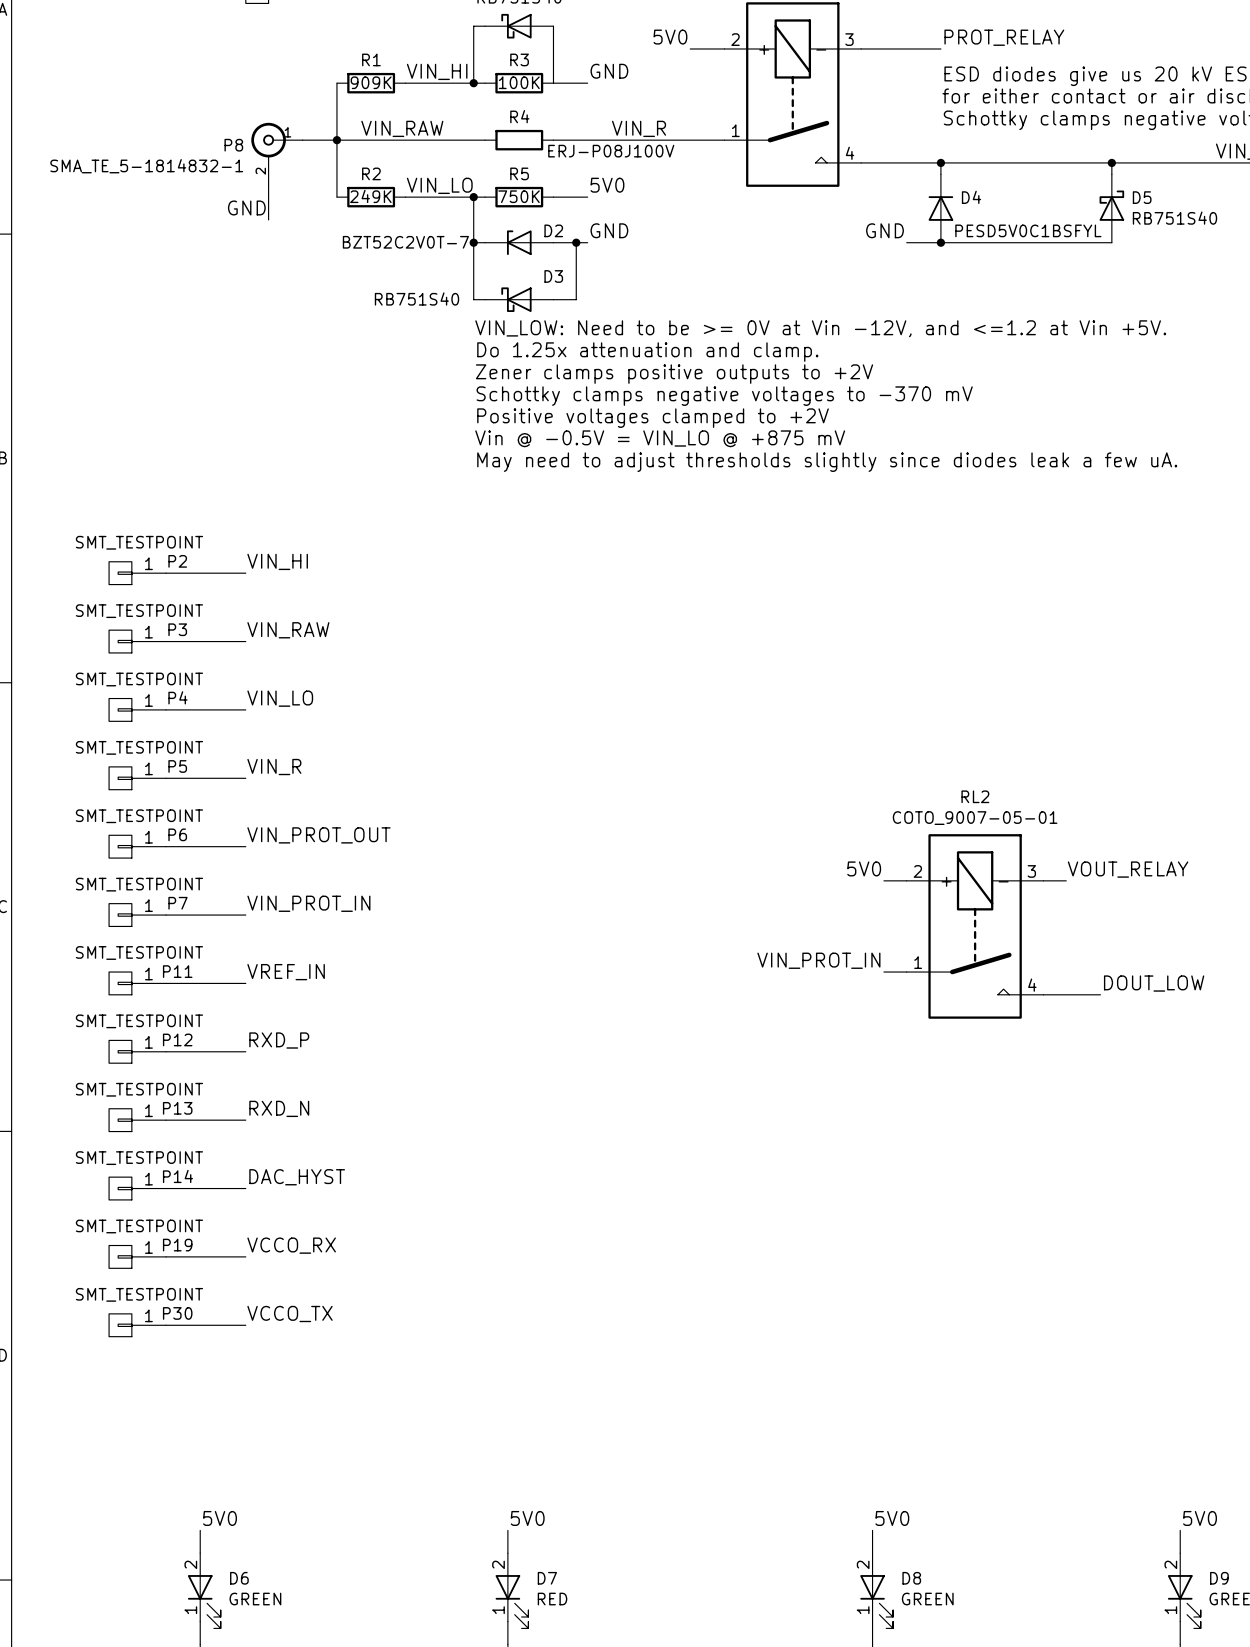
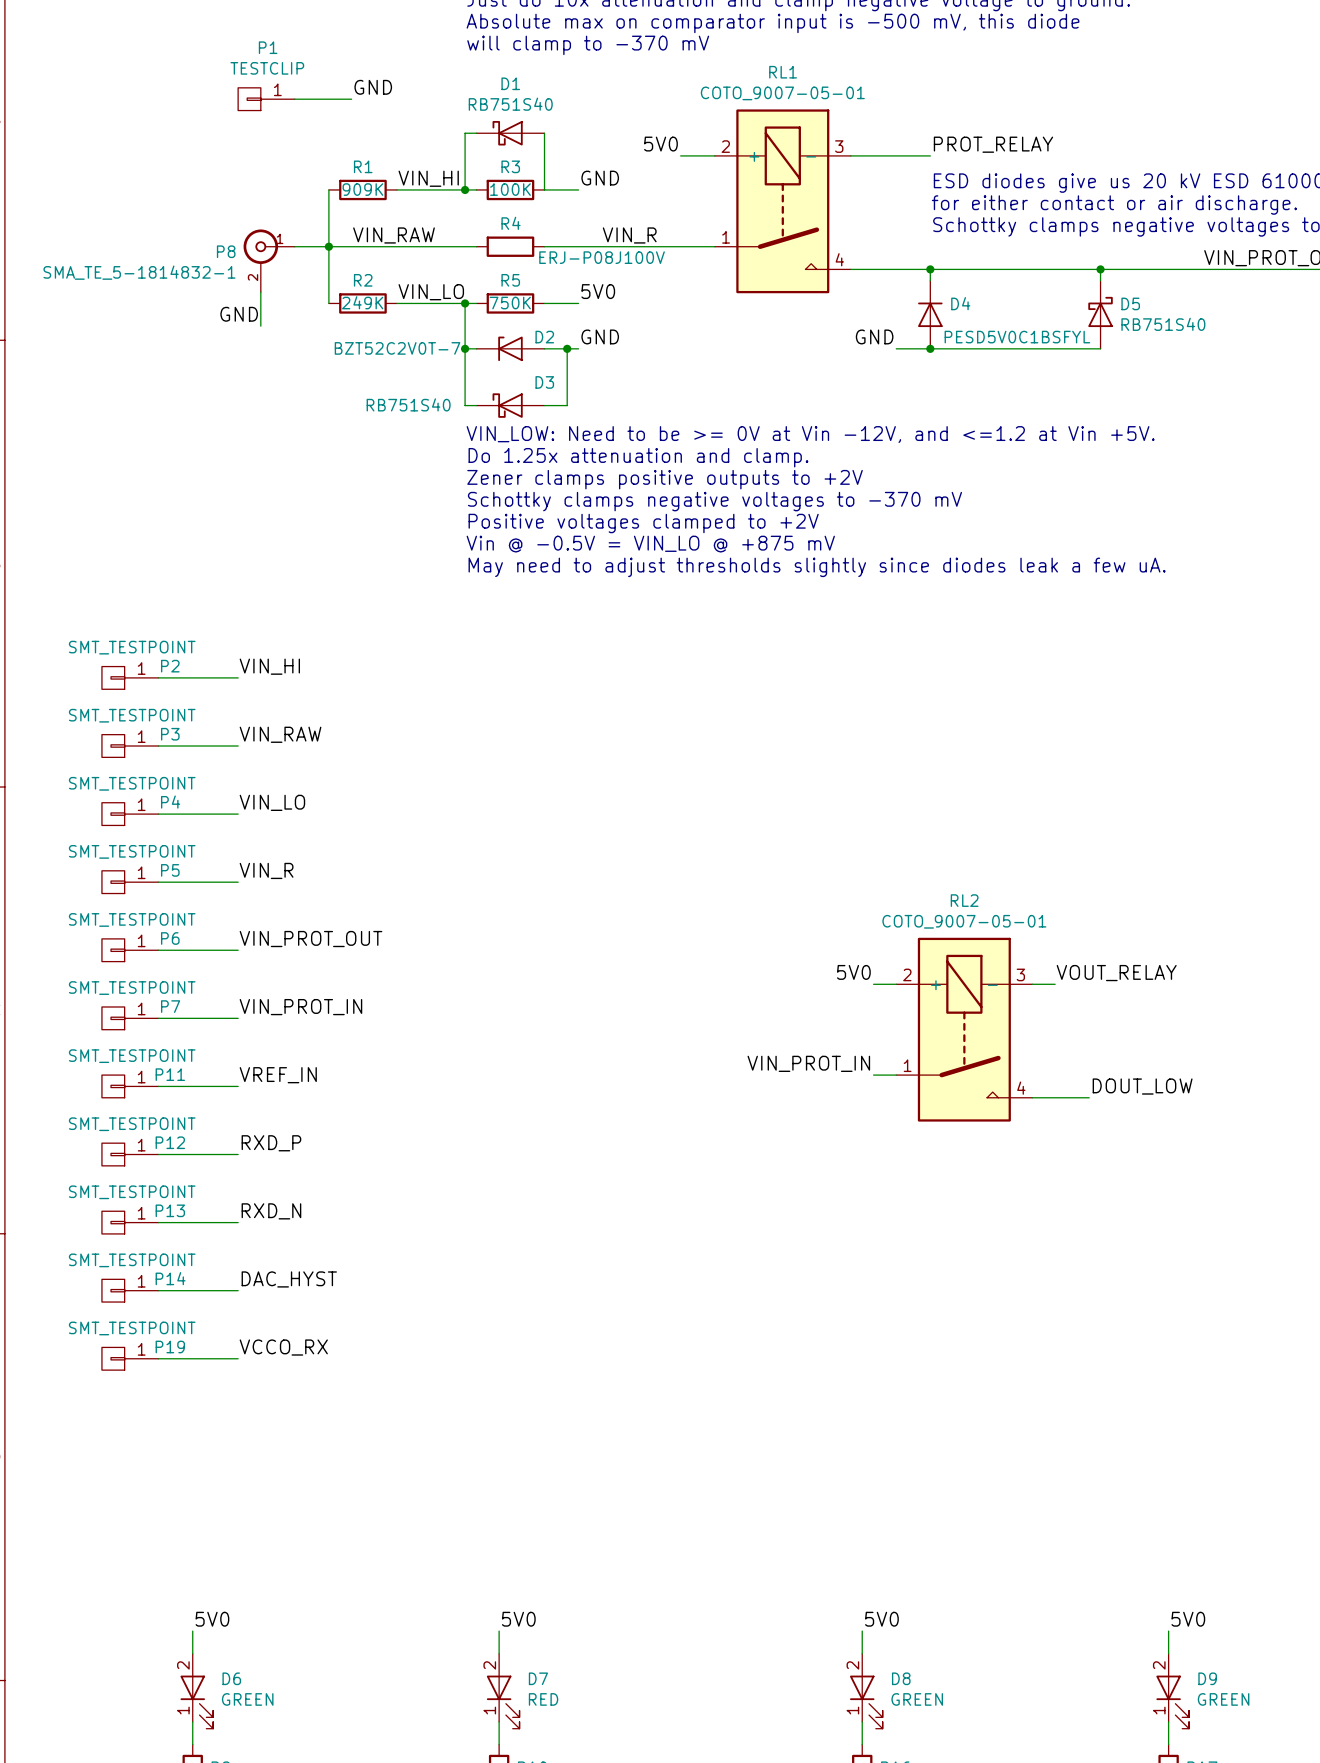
label: VCCO_TX (290, 1314) -> none
P30: SMT_TESTPOINT (137, 1325) -> none
wire: (166, 1325) (245, 1325) -> none

